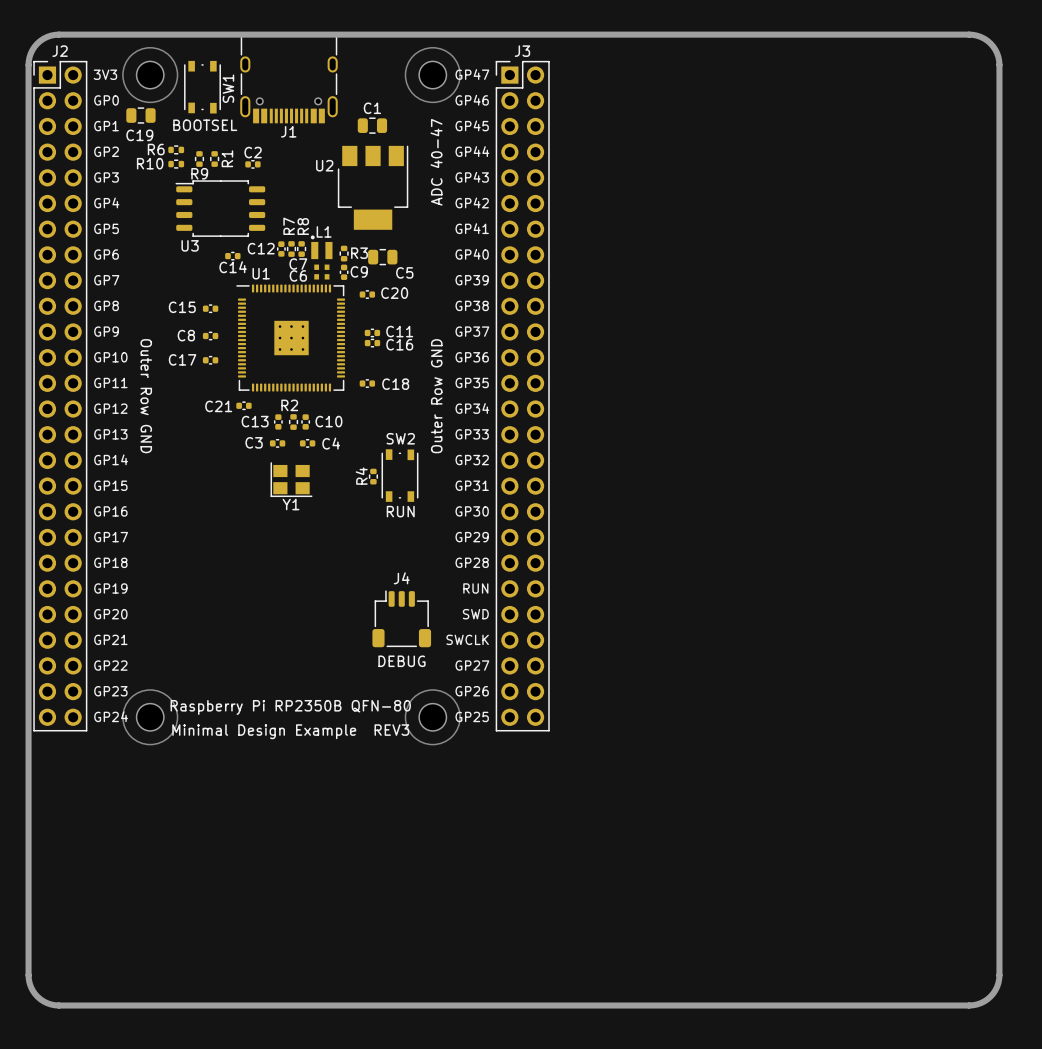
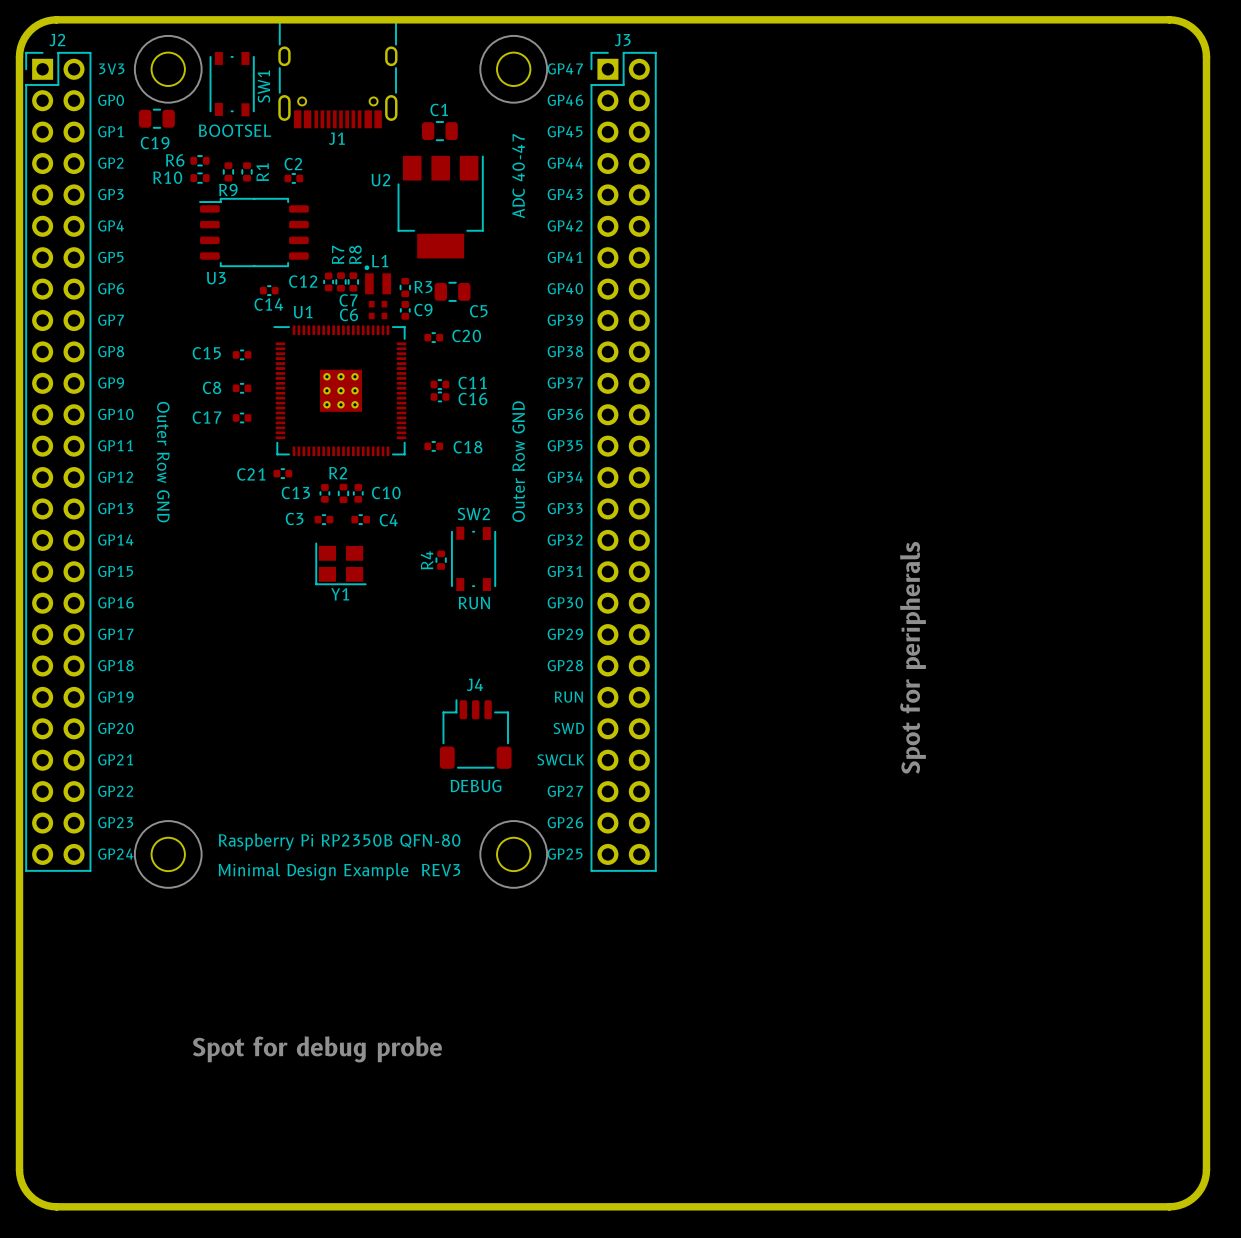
text: none -> Spot for peripherals (912, 657)
text: none -> Spot for debug probe (317, 1049)

